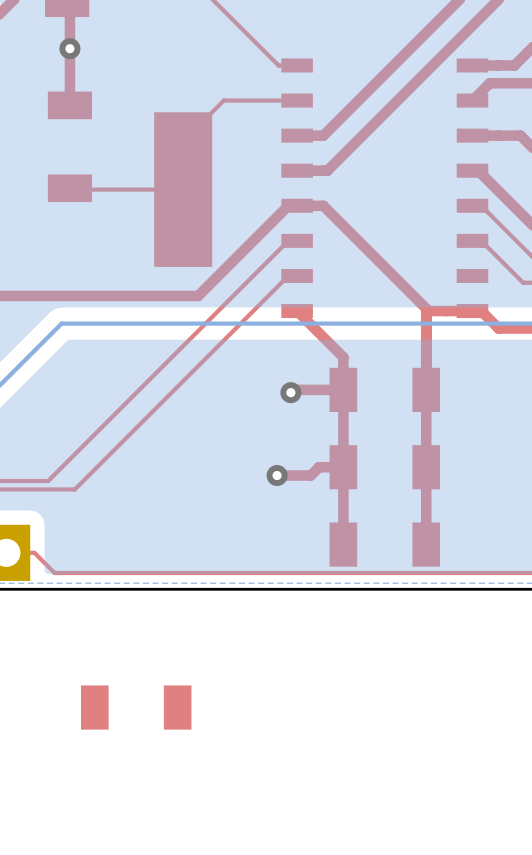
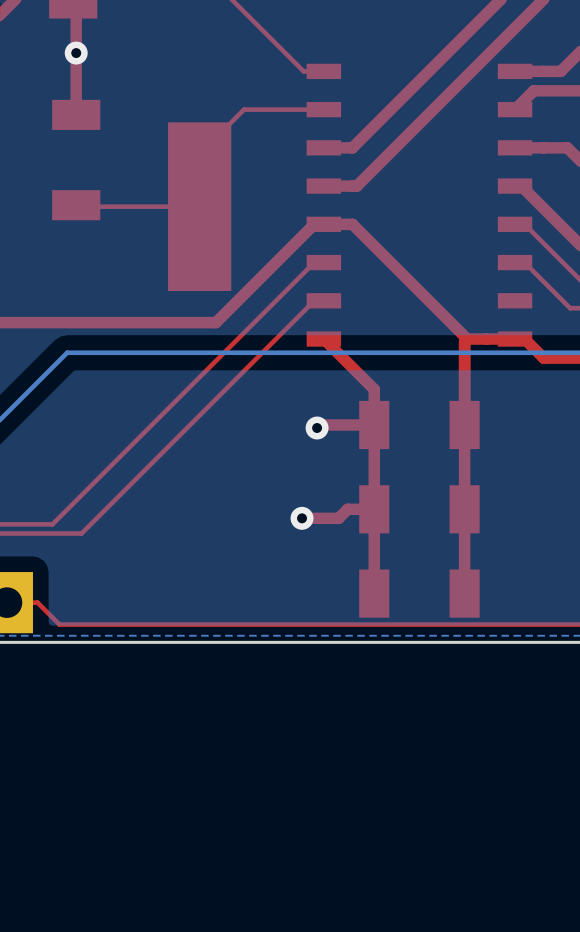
part: (136, 707) -> none

